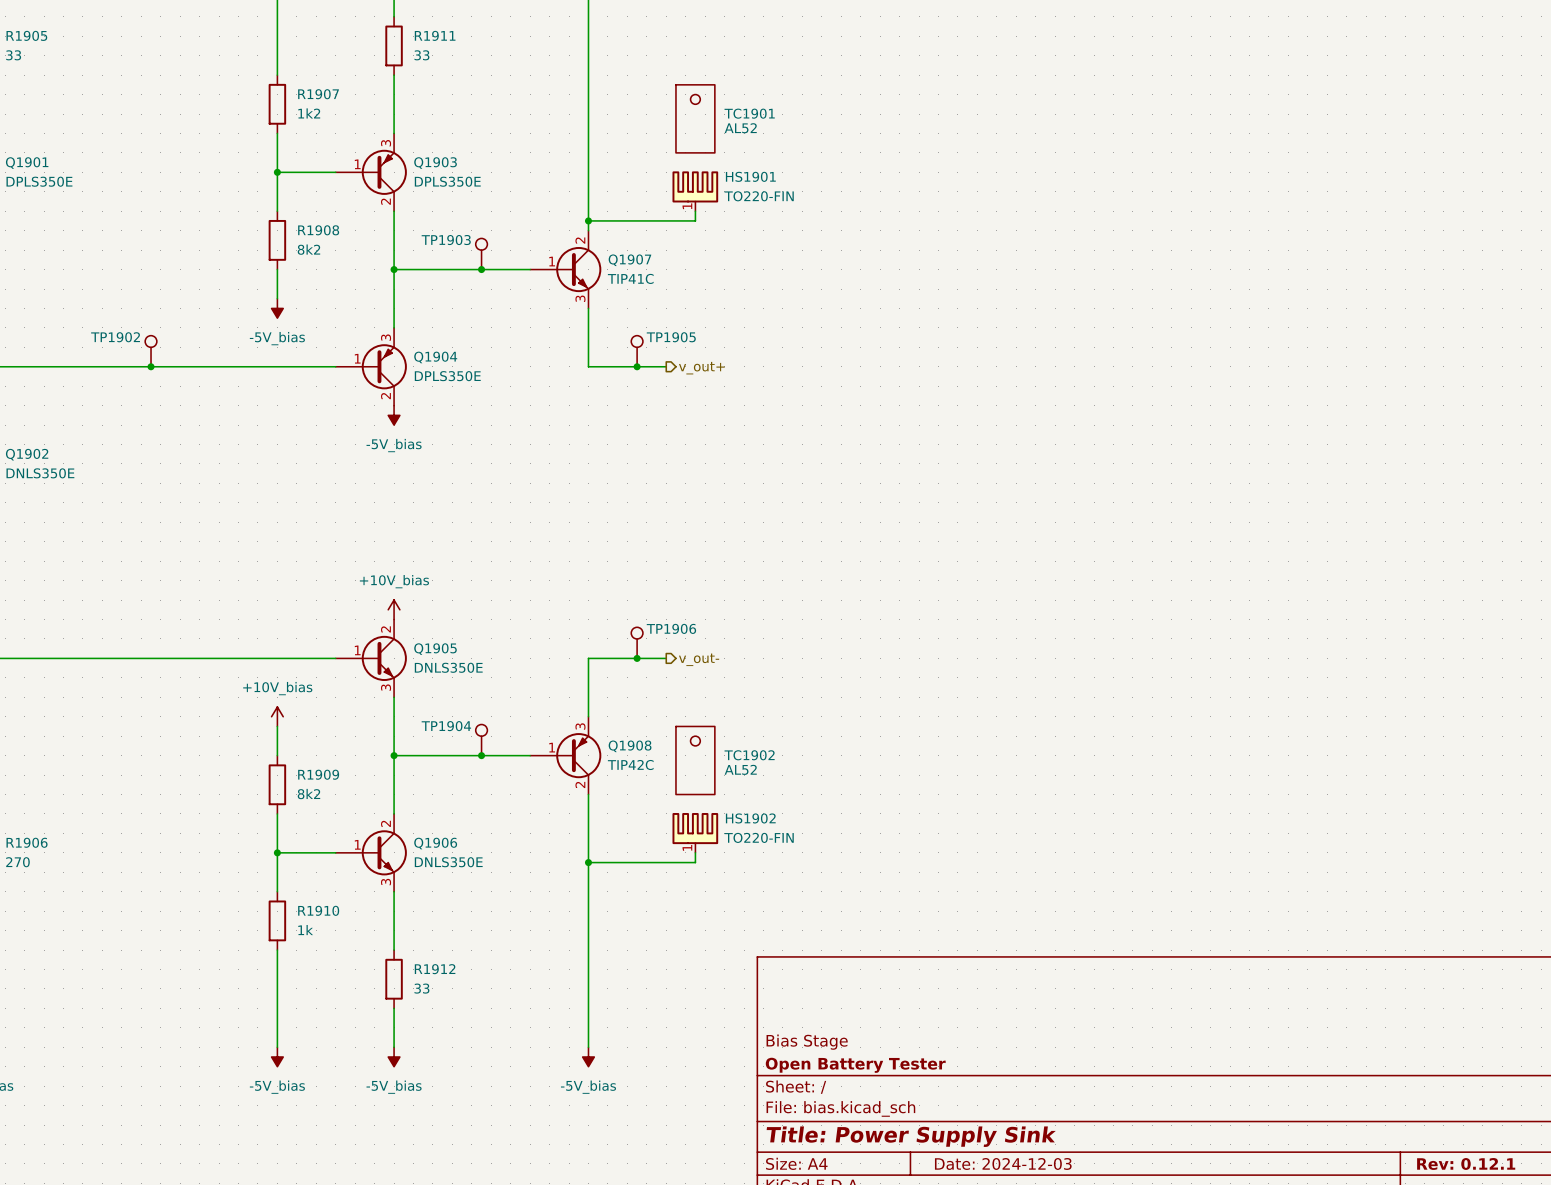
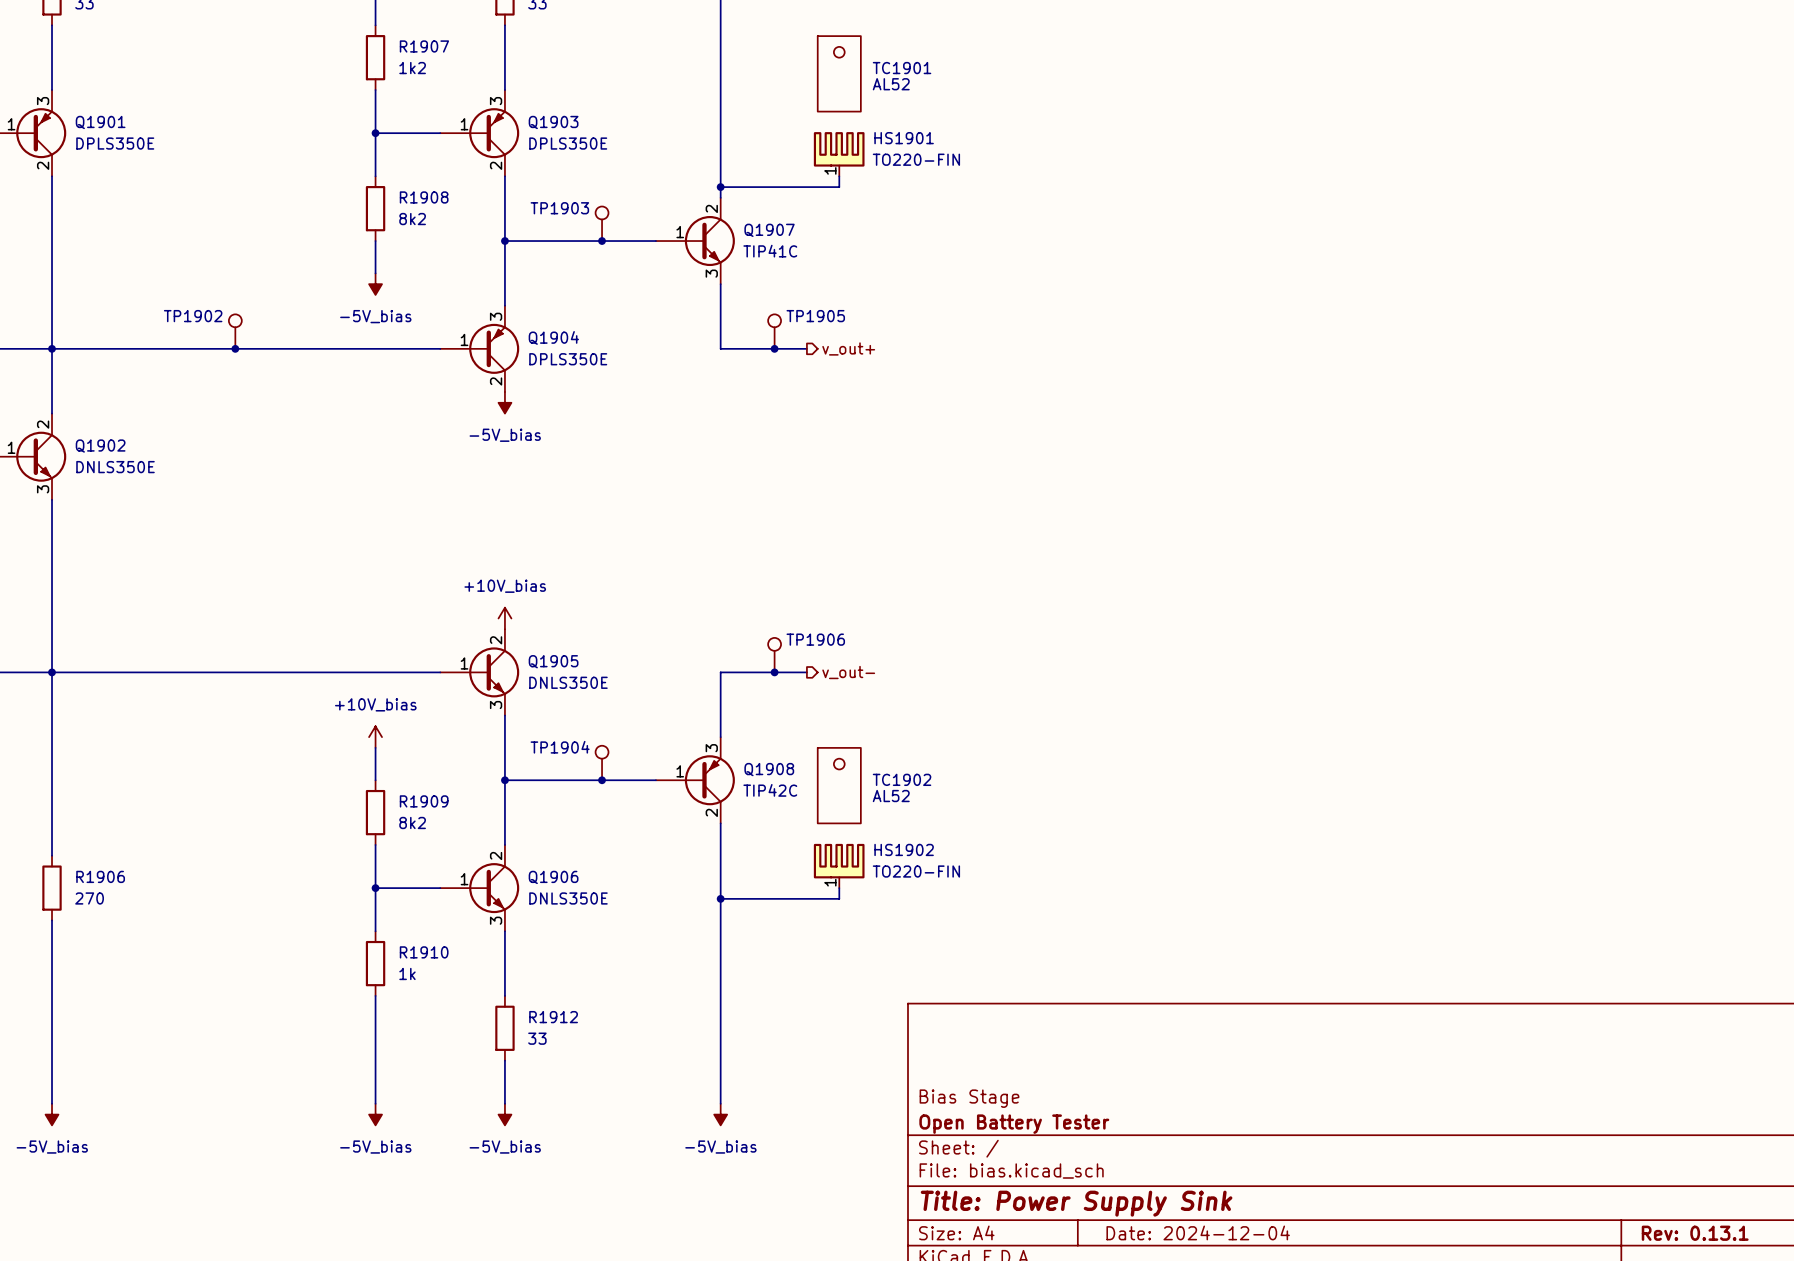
title block: Date: 2024-12-03 (1003, 1163) -> Date: 2024-12-04 (1198, 1232)
title block: Rev: 0.12.1 (1466, 1163) -> Rev: 0.13.1 (1695, 1233)

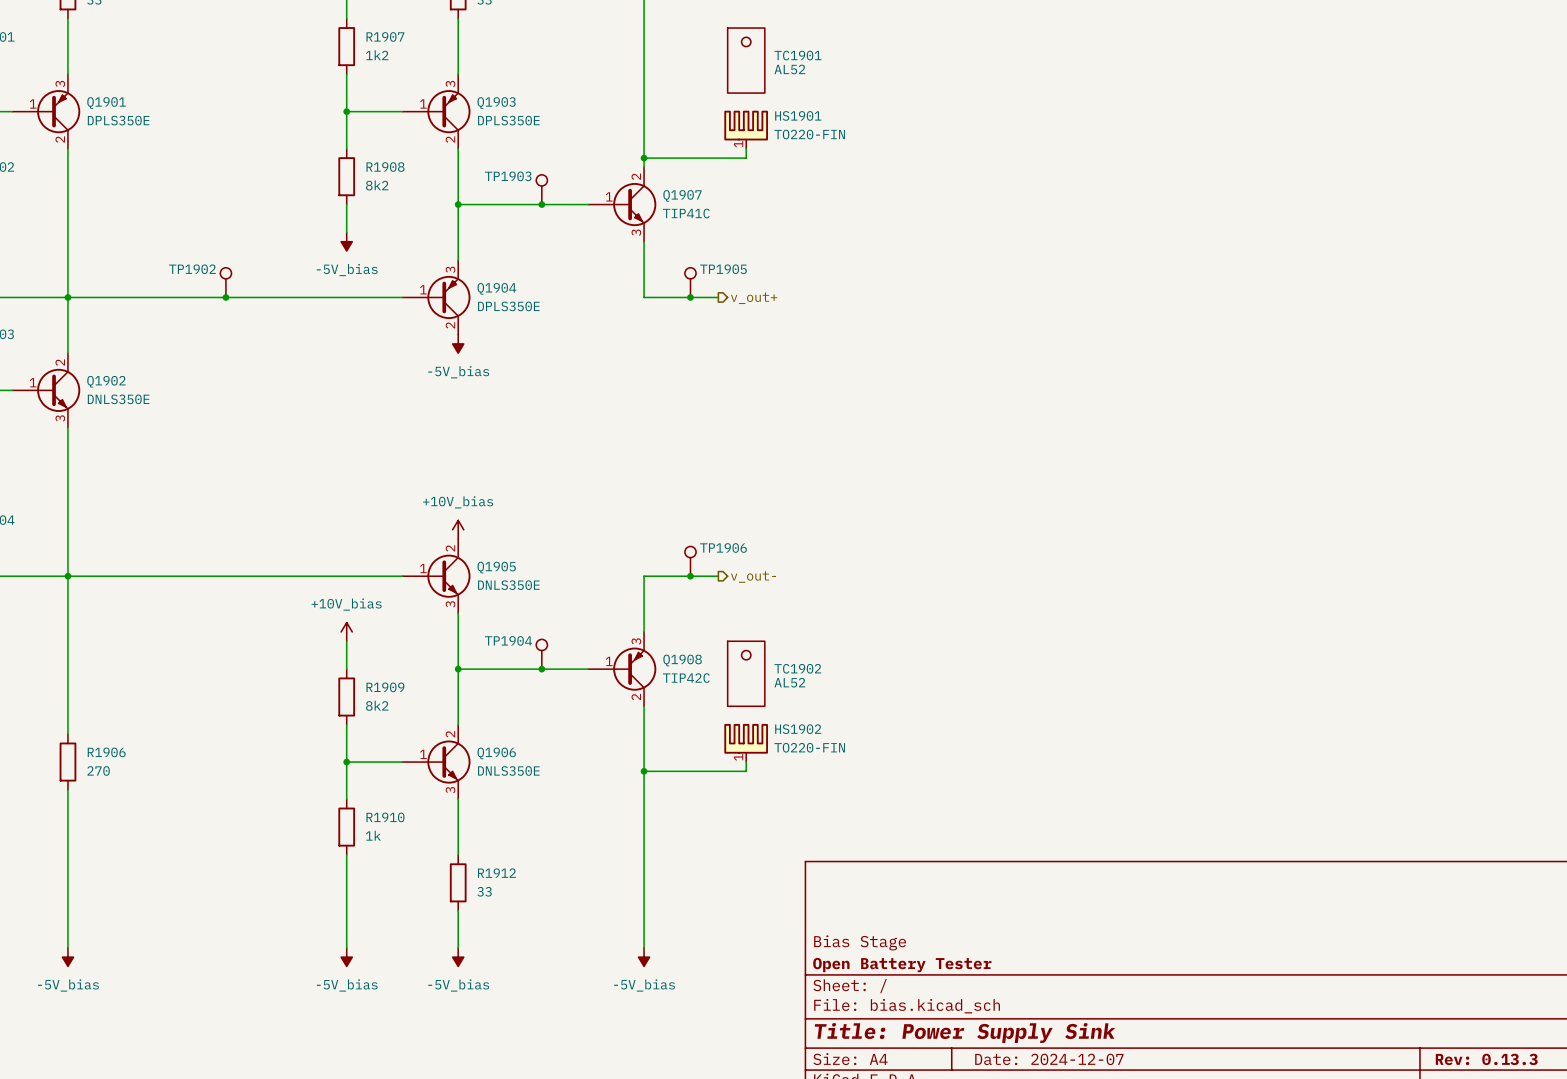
title block: Date: 2024-12-04 (1198, 1232) -> Date: 2024-12-07 (1049, 1059)
title block: Rev: 0.13.1 (1695, 1233) -> Rev: 0.13.3 (1486, 1059)

